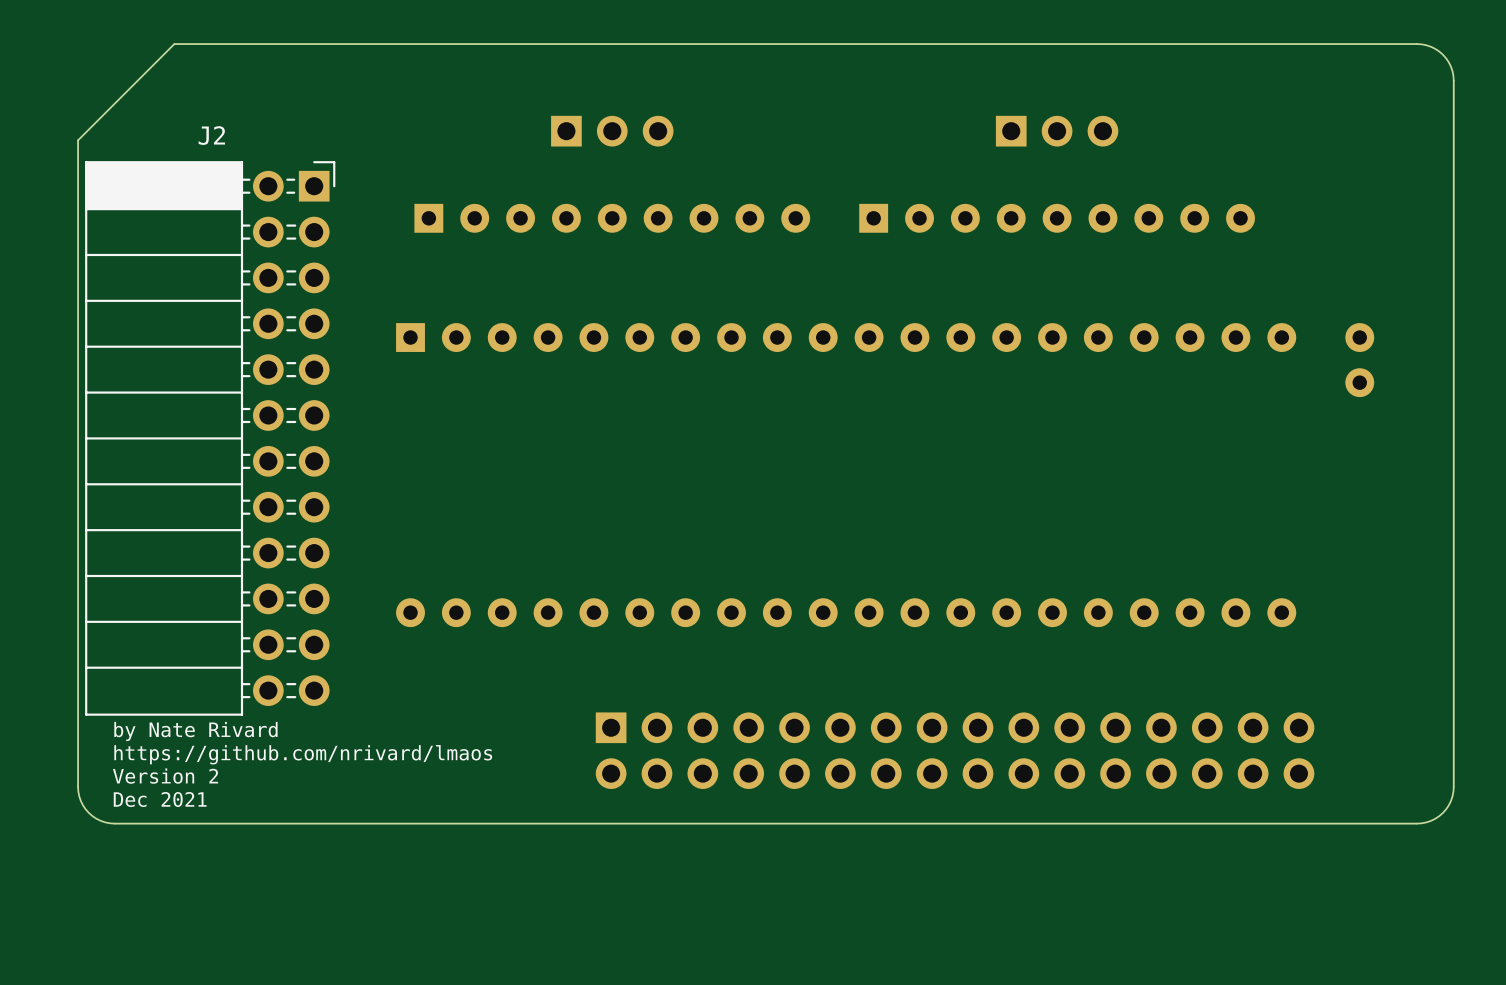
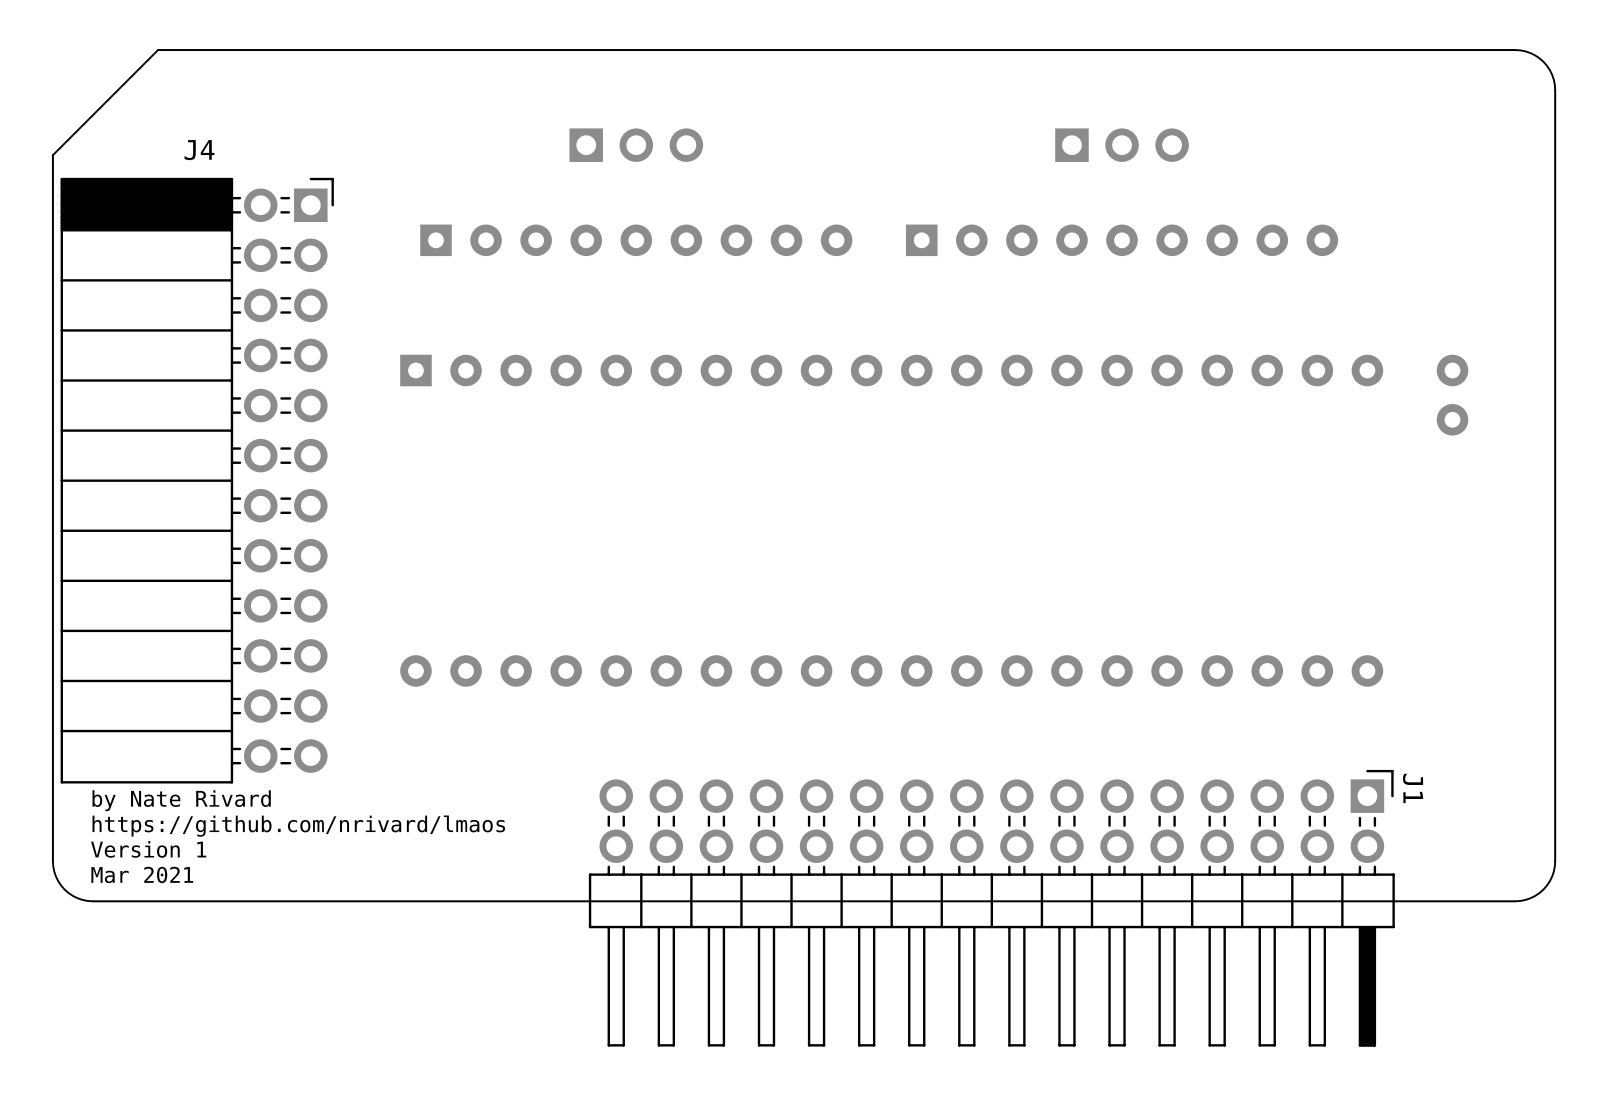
J2 name: J2 (211, 135) -> J4 (199, 150)
part: (955, 750) -> none
text: Version 2 (165, 776) -> Version 1 (148, 849)
text: Dec 2021 (160, 799) -> Mar 2021 (142, 874)
J1: none -> (991, 908)

